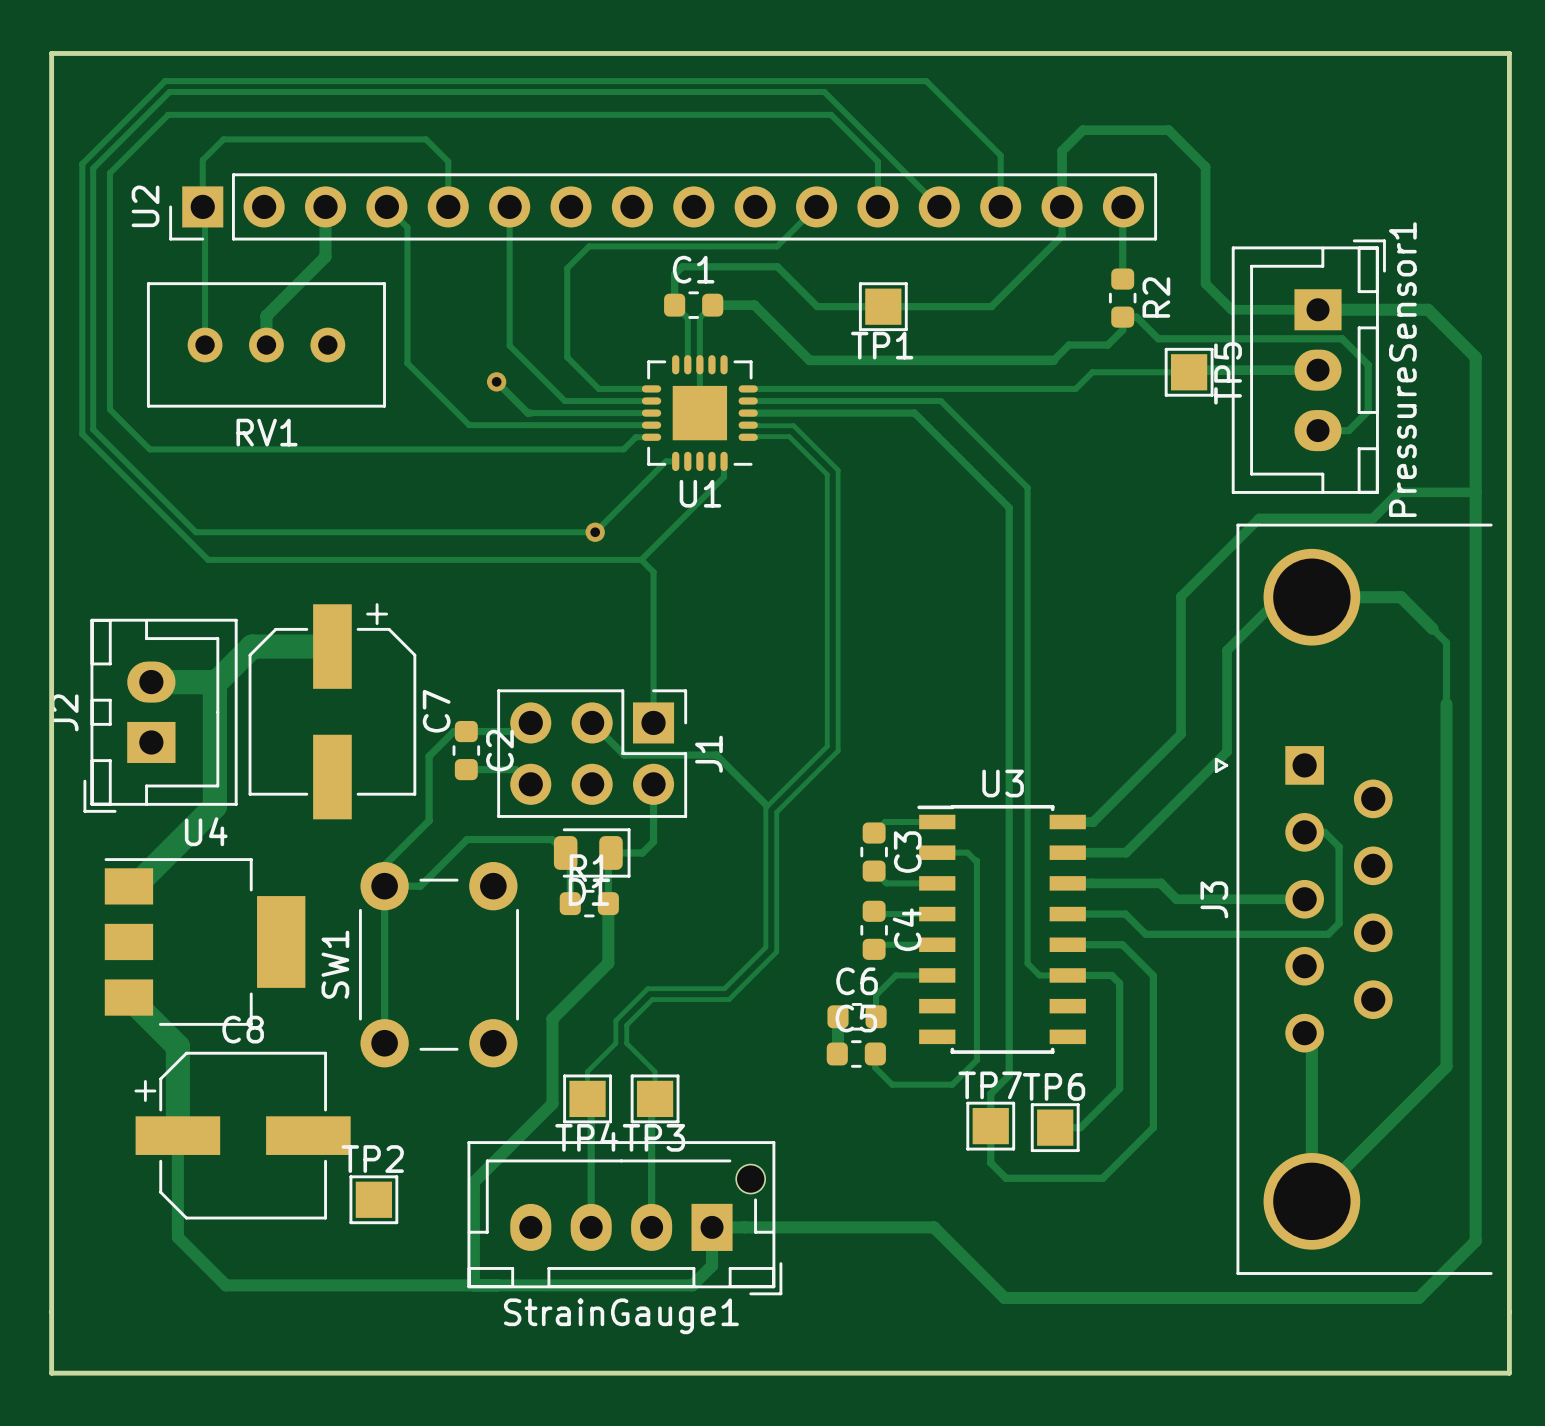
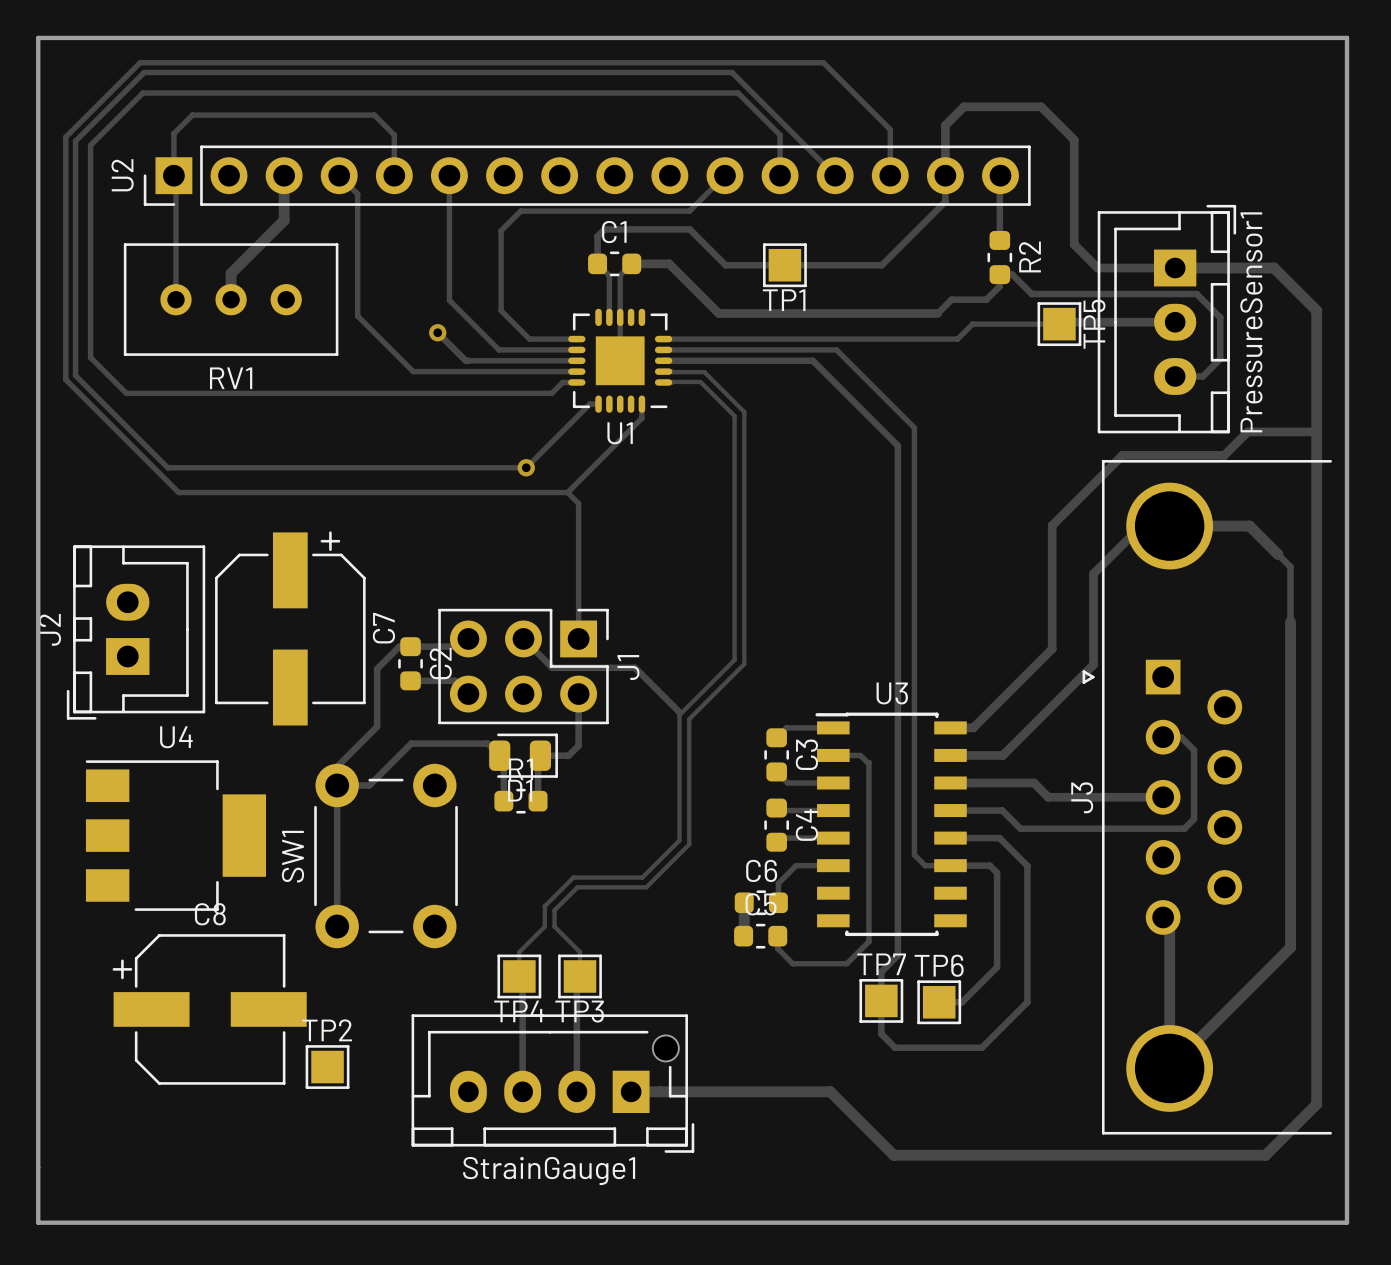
track: (332, 646) (252, 646) (216, 682) (151, 682) -> none
track: (214, 682) (214, 806) (134, 886) (128, 886) -> none
track: (608, 903) (608, 963) (552, 1019) (552, 1103) (473, 1182) (473, 1285) -> none
track: (128, 997) (177, 1046) (177, 1237) (225, 1285) (692, 1285) (712, 1265) (712, 1227) -> none

